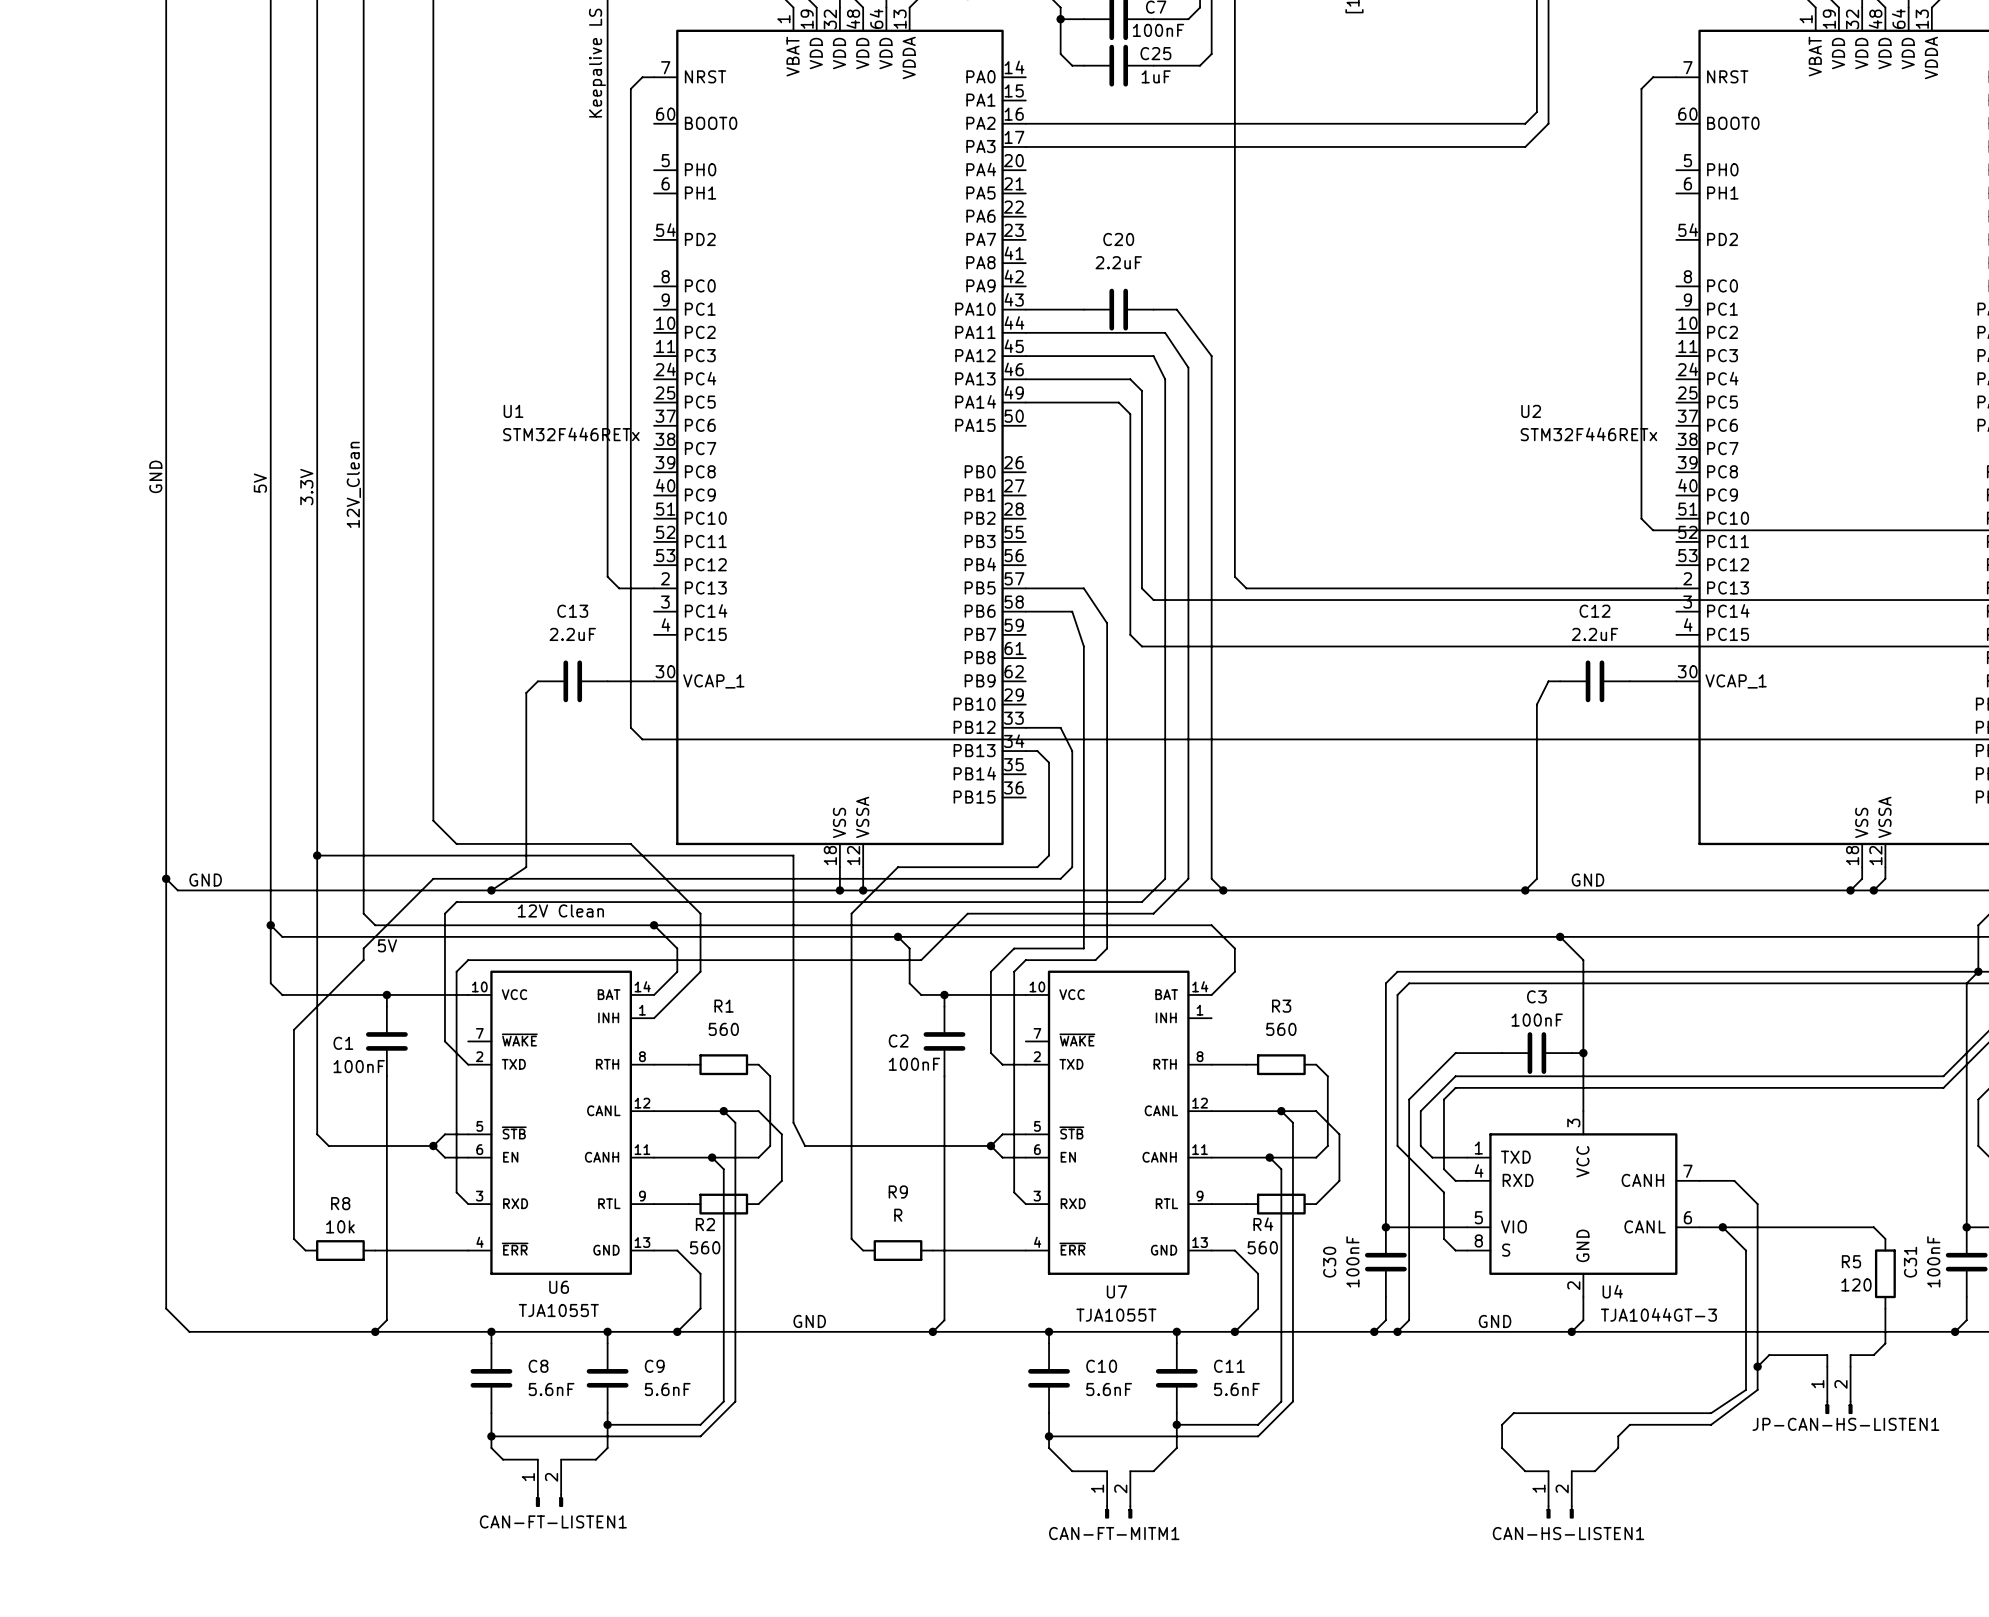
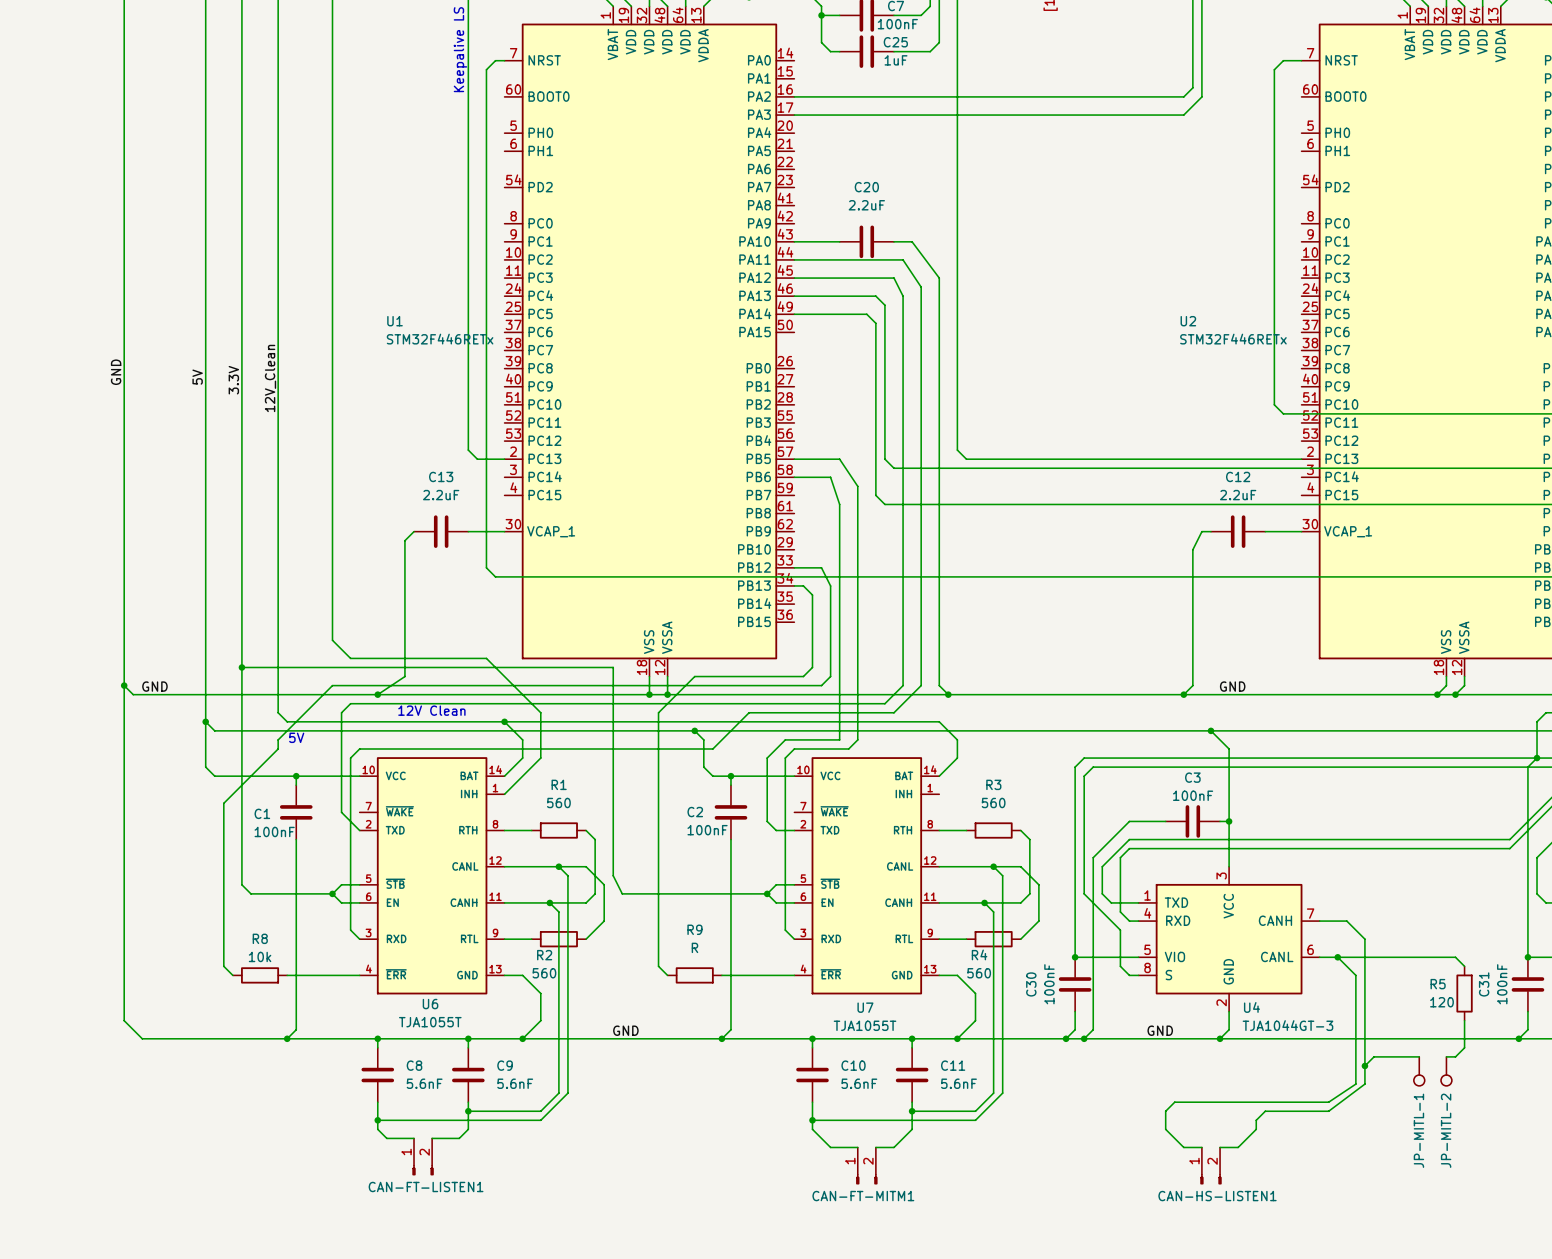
wire: (1862, 1355) (1850, 1355) (1850, 1366) -> none
JP-MITL-1: none -> (1419, 1071)
JP-MITL-2: none -> (1446, 1071)
JP-CAN-HS-LISTEN1: (1838, 1390) -> none

